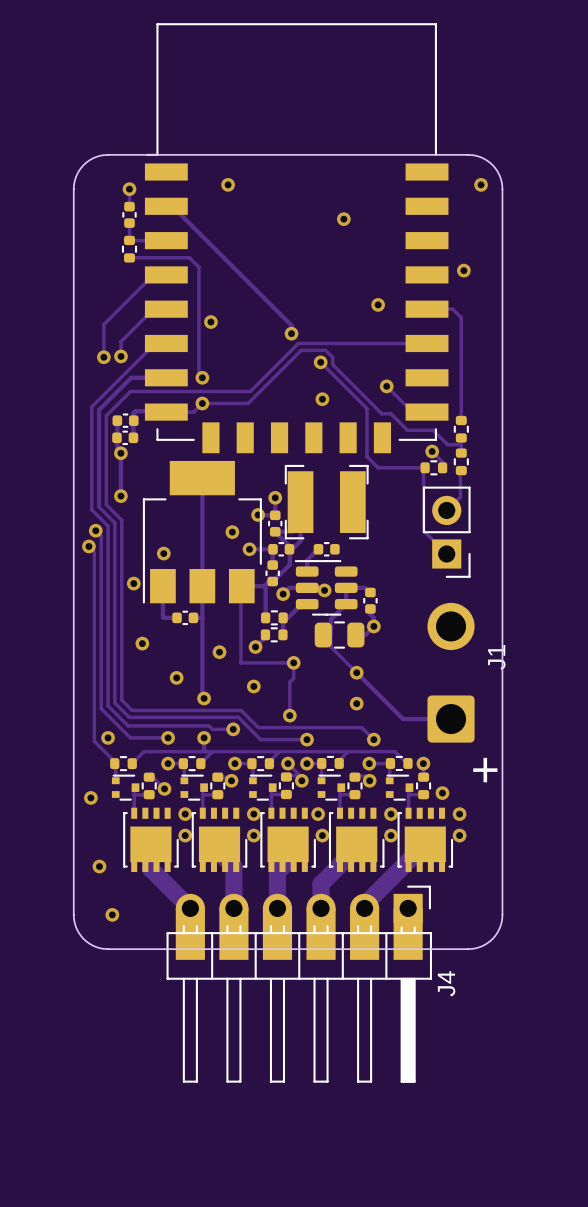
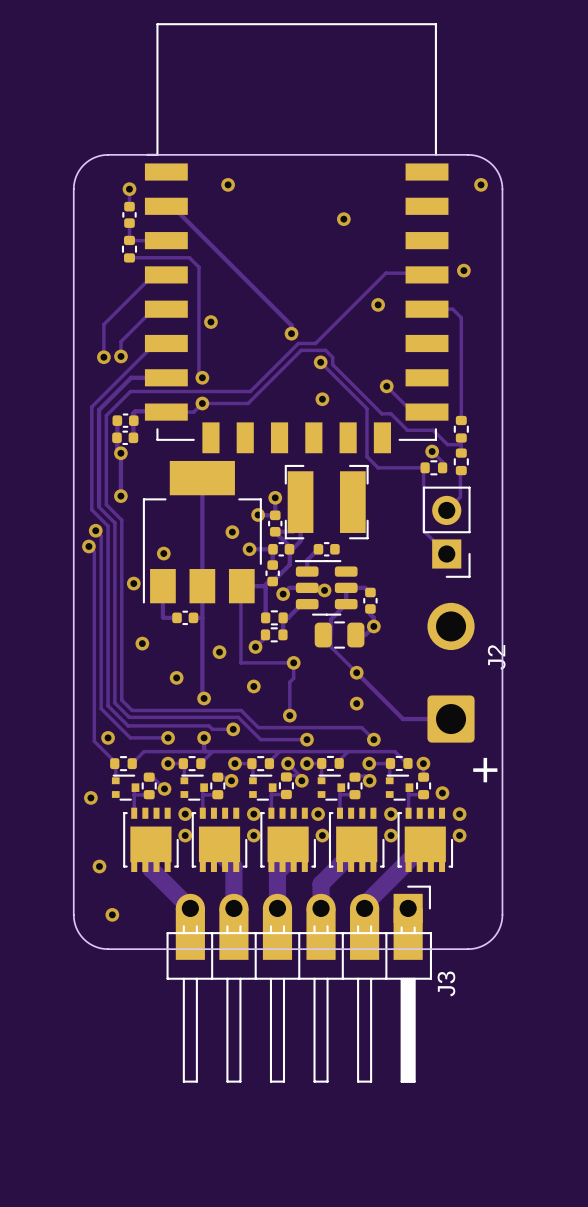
track: (315, 343) (427, 343) -> (315, 343) (385, 273) (420, 273)
J1 name: J1 (496, 657) -> J2 (496, 657)
J4 name: J4 (446, 983) -> J3 (446, 983)

